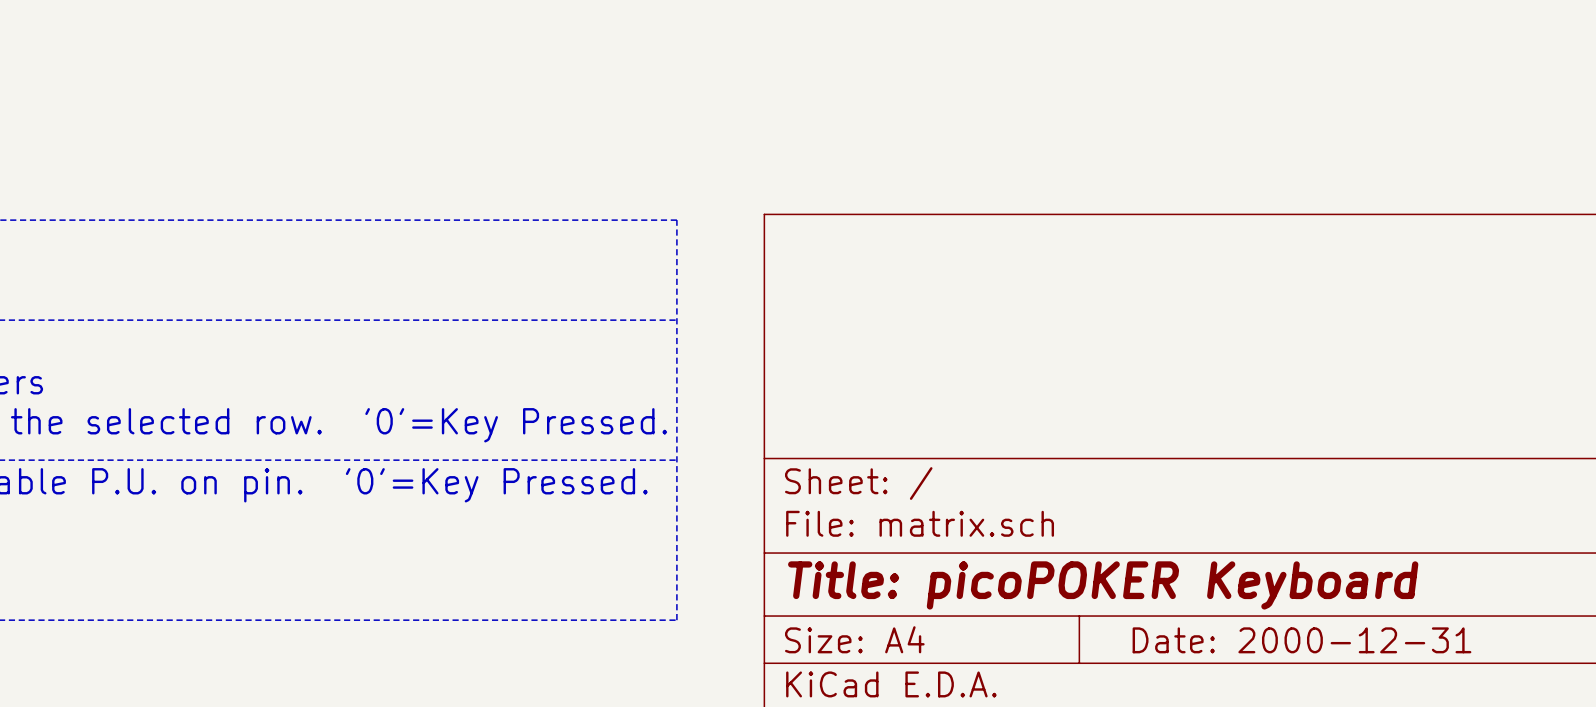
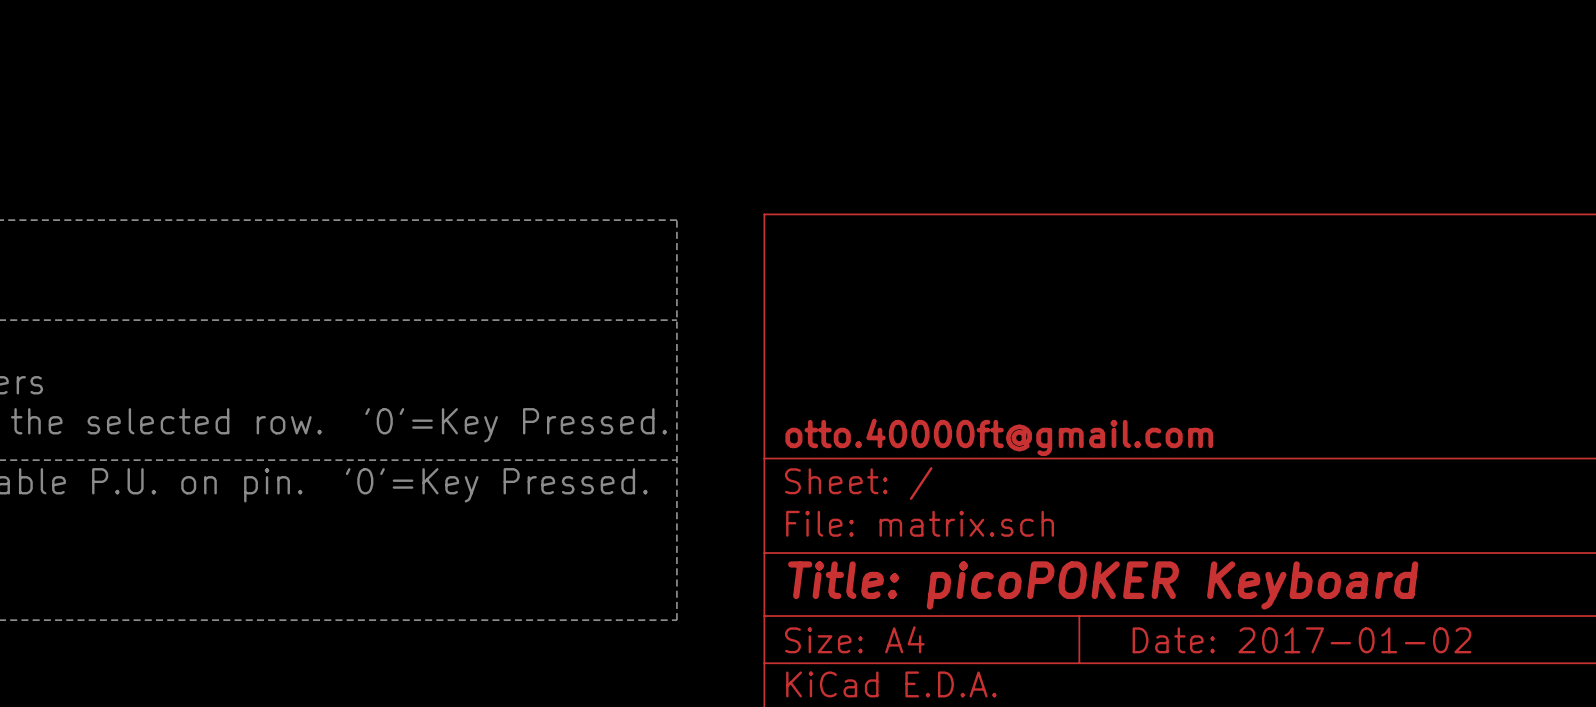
title block: none -> otto.40000ft@gmail.com (999, 437)
title block: Date: 2000-12-31 (1301, 640) -> Date: 2017-01-02 (1301, 640)

